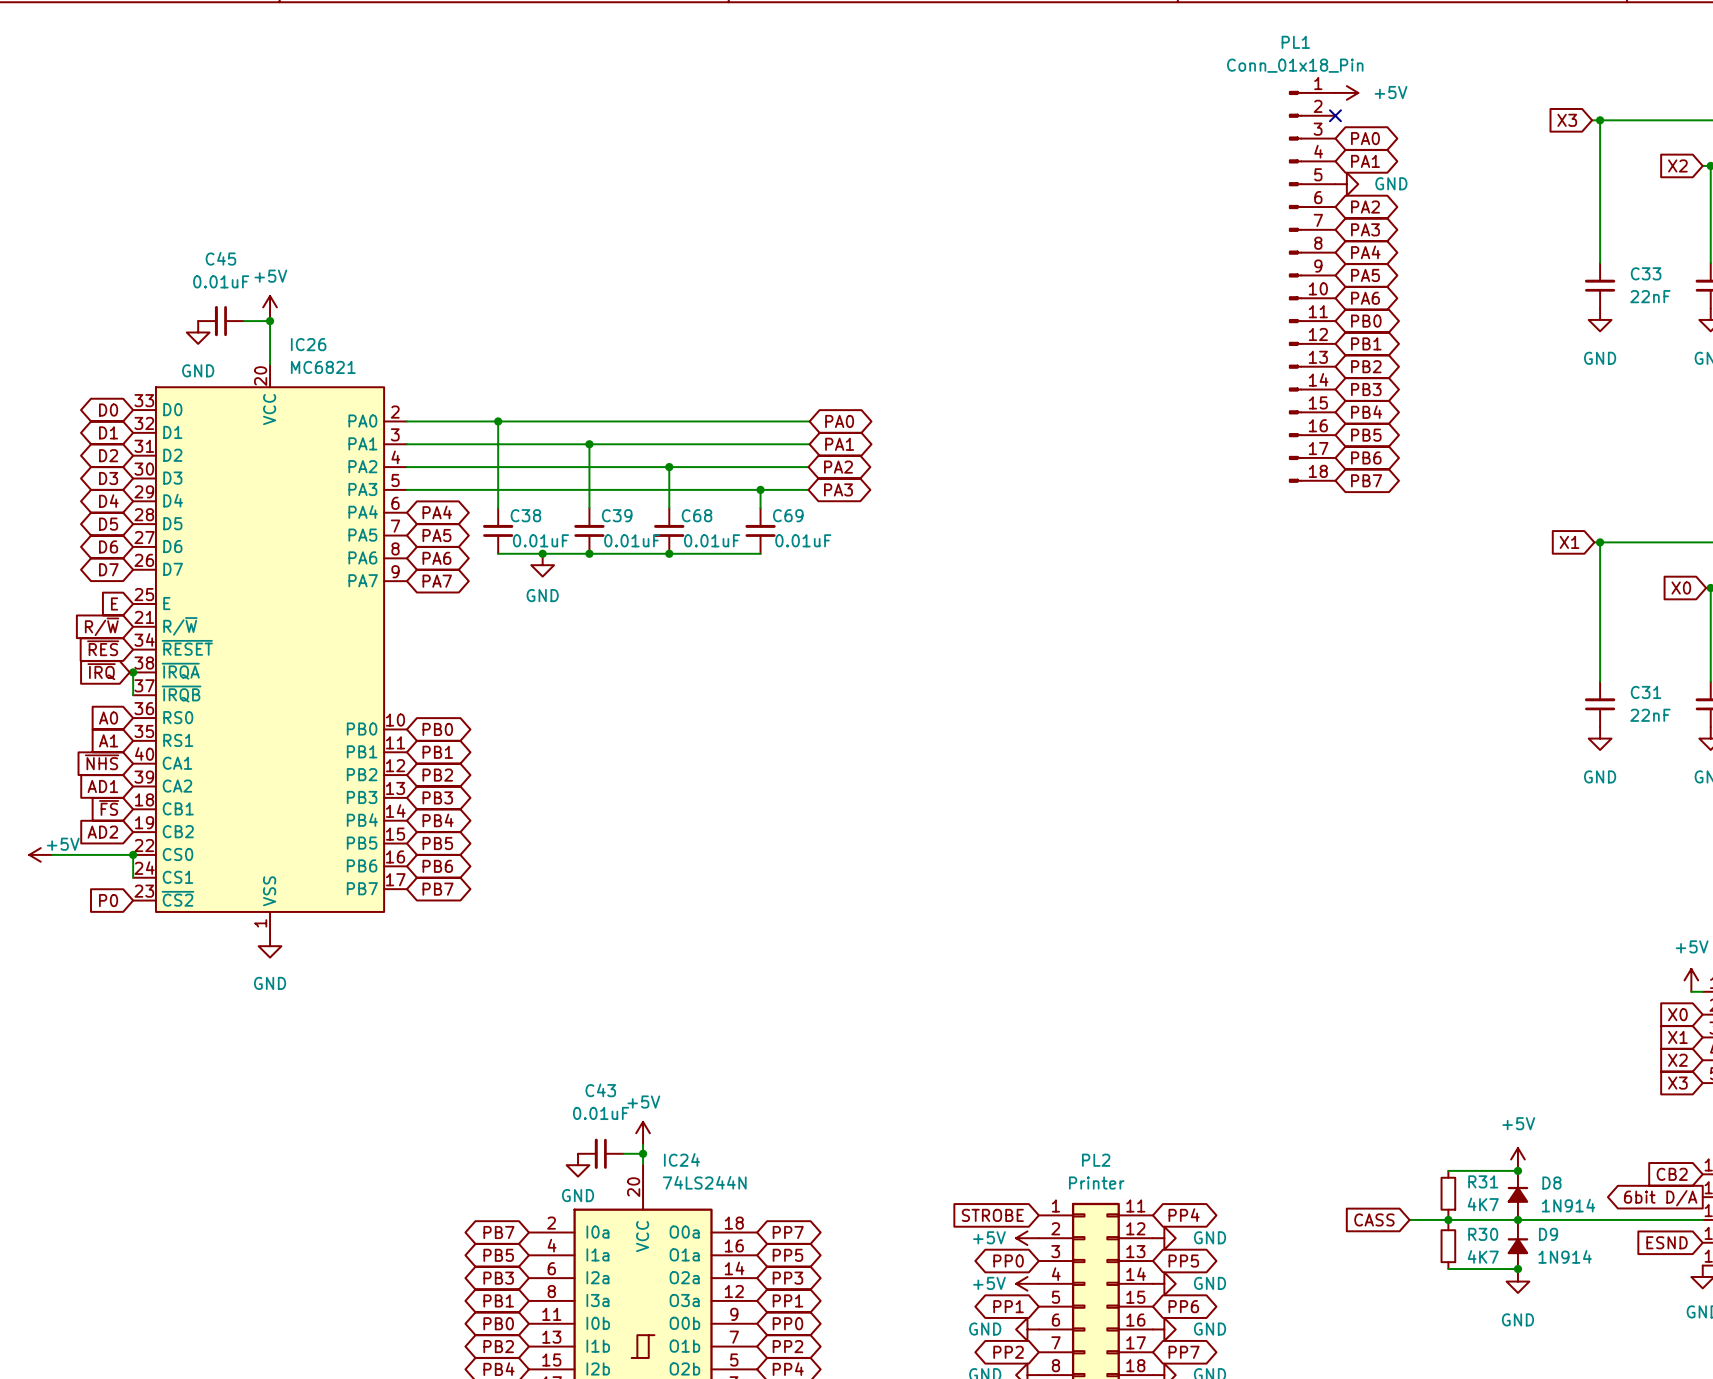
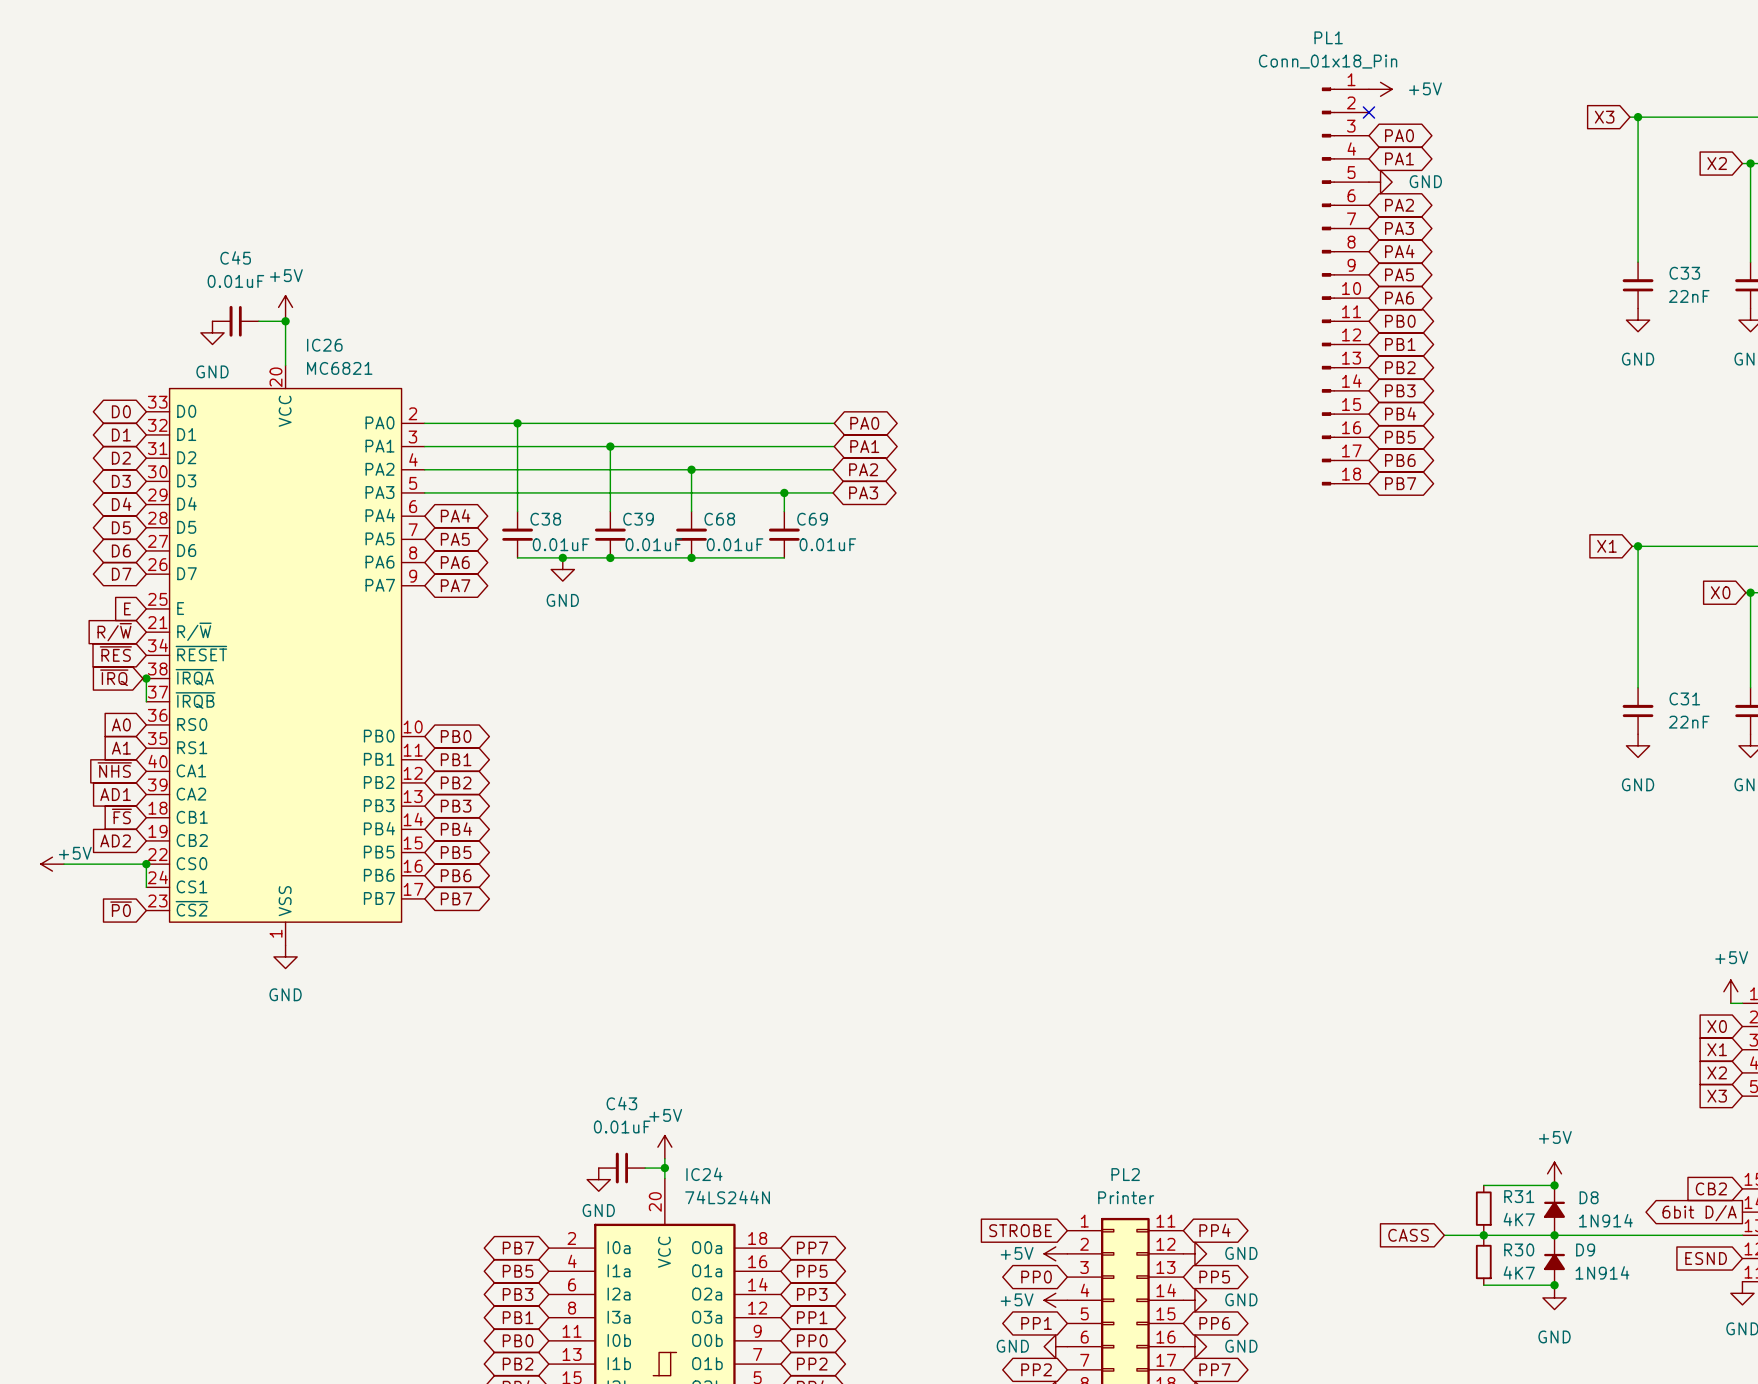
global label: P0 (108, 900) -> ~{P0} (121, 909)

